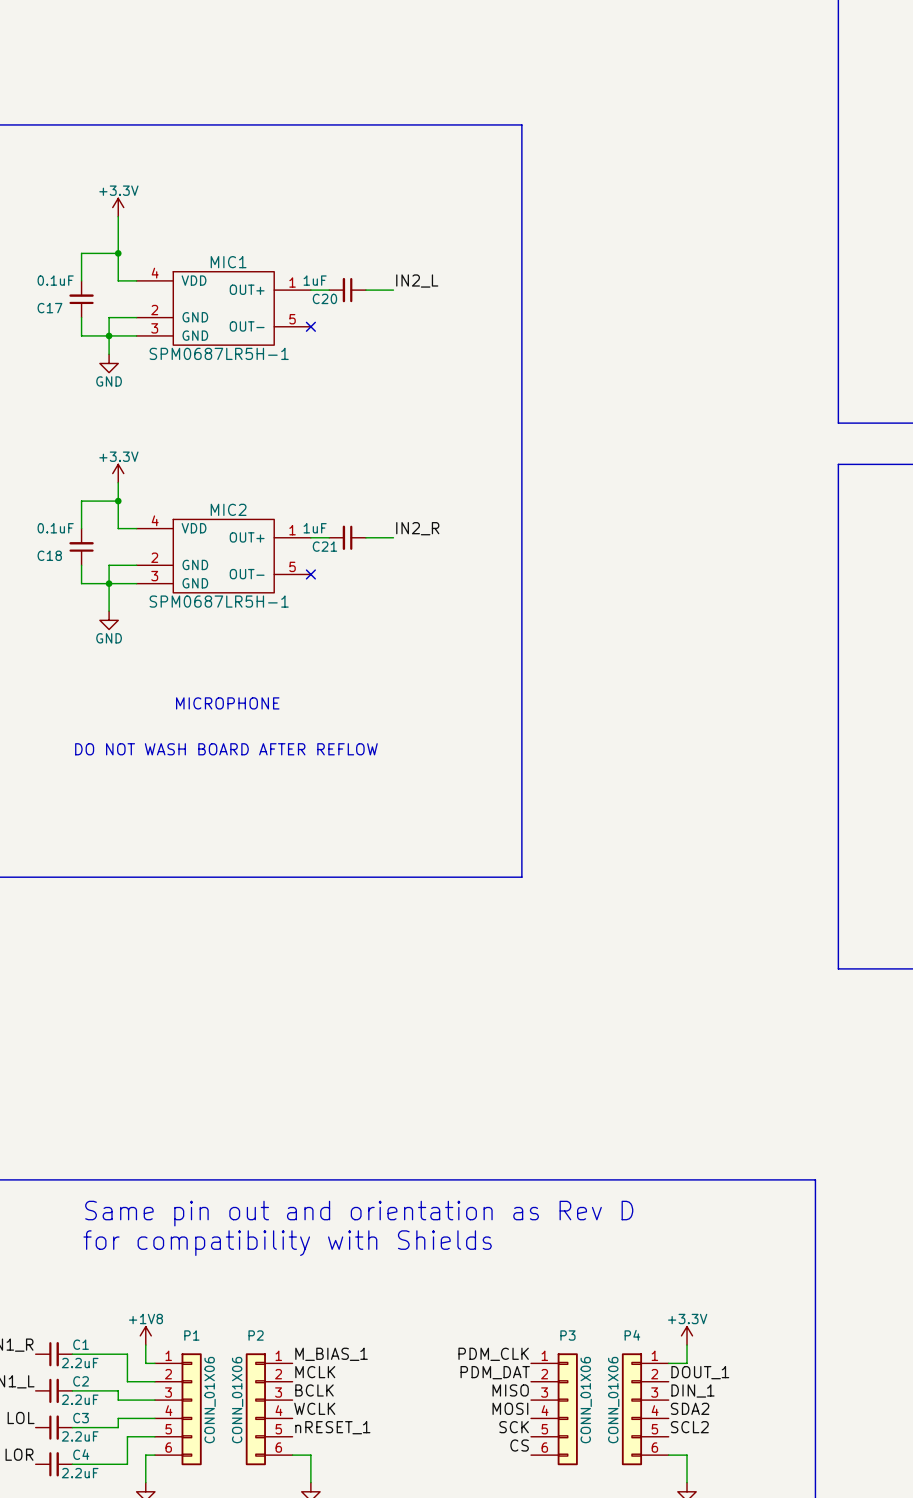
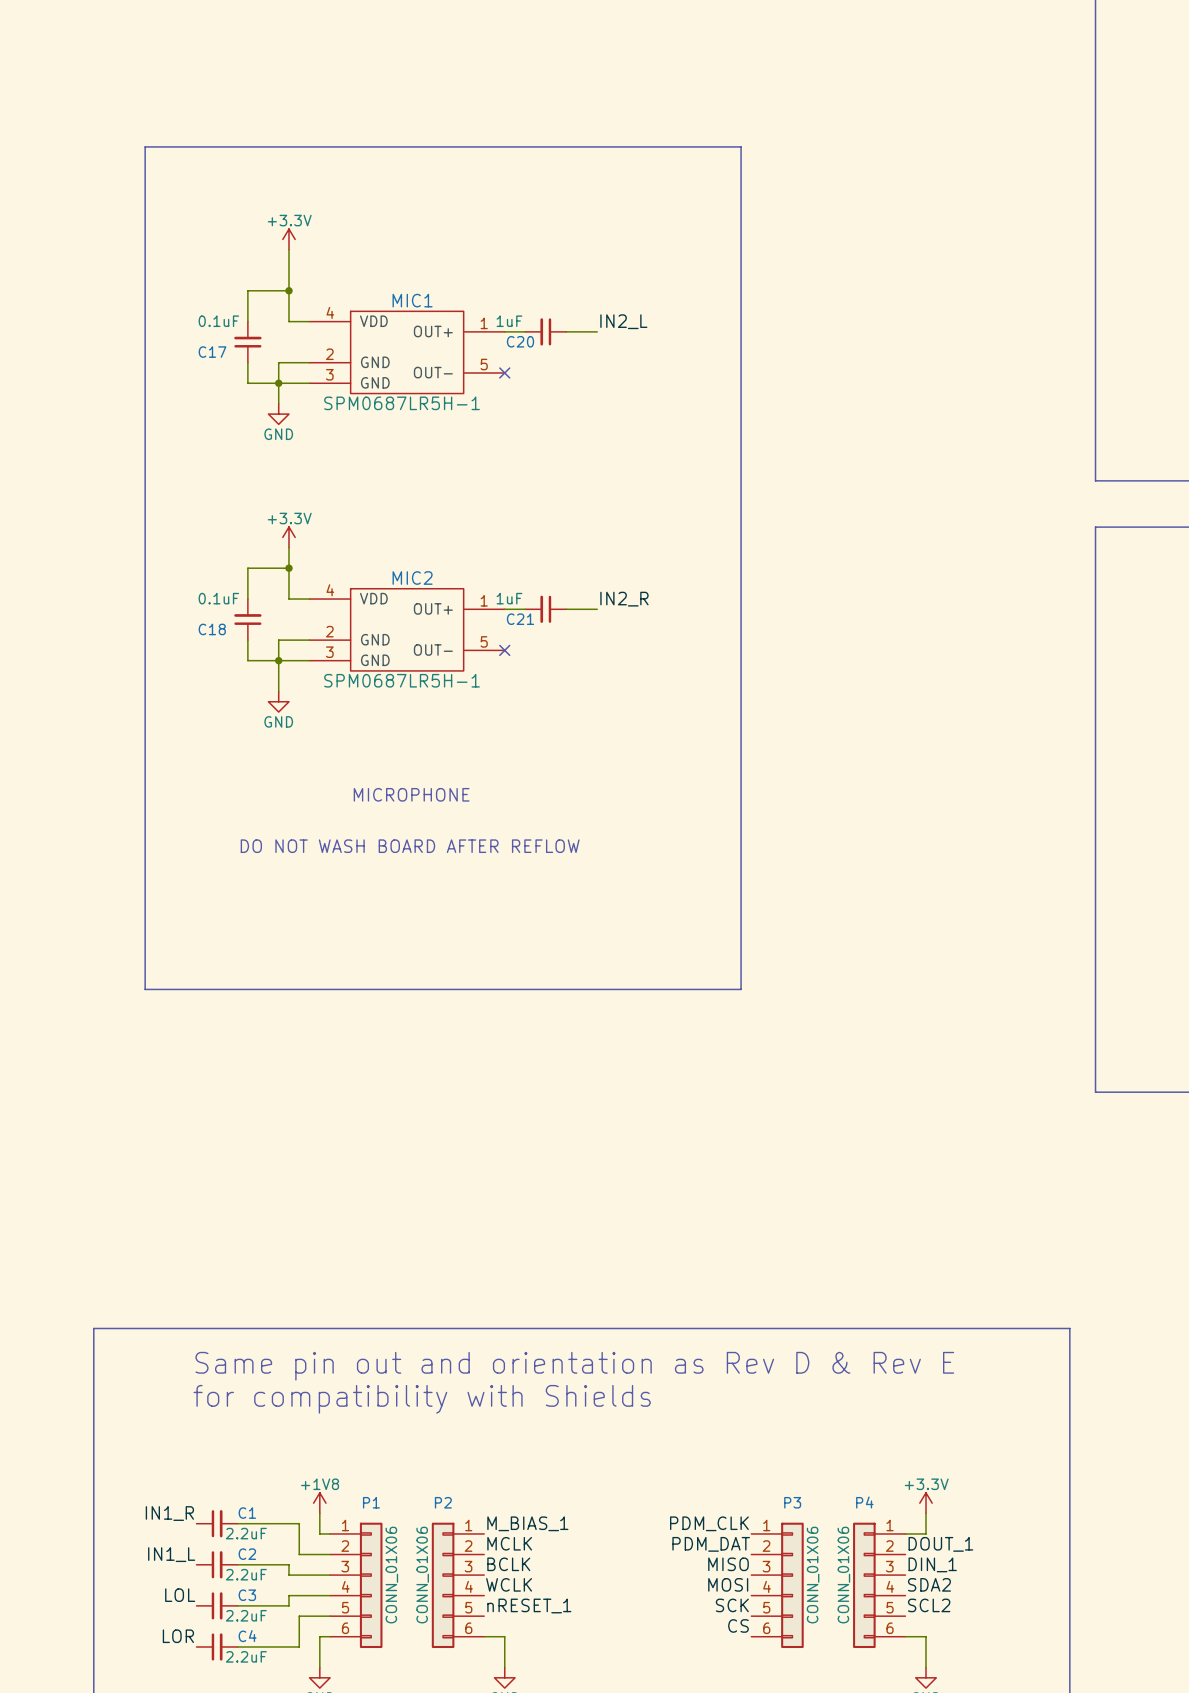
text: Same pin out and orientation as Rev D (359, 1213) -> Same pin out and orientation as Rev D & Rev E (574, 1366)
text position: for compatibility with Shields (287, 1243) -> for compatibility with Shields (422, 1399)

